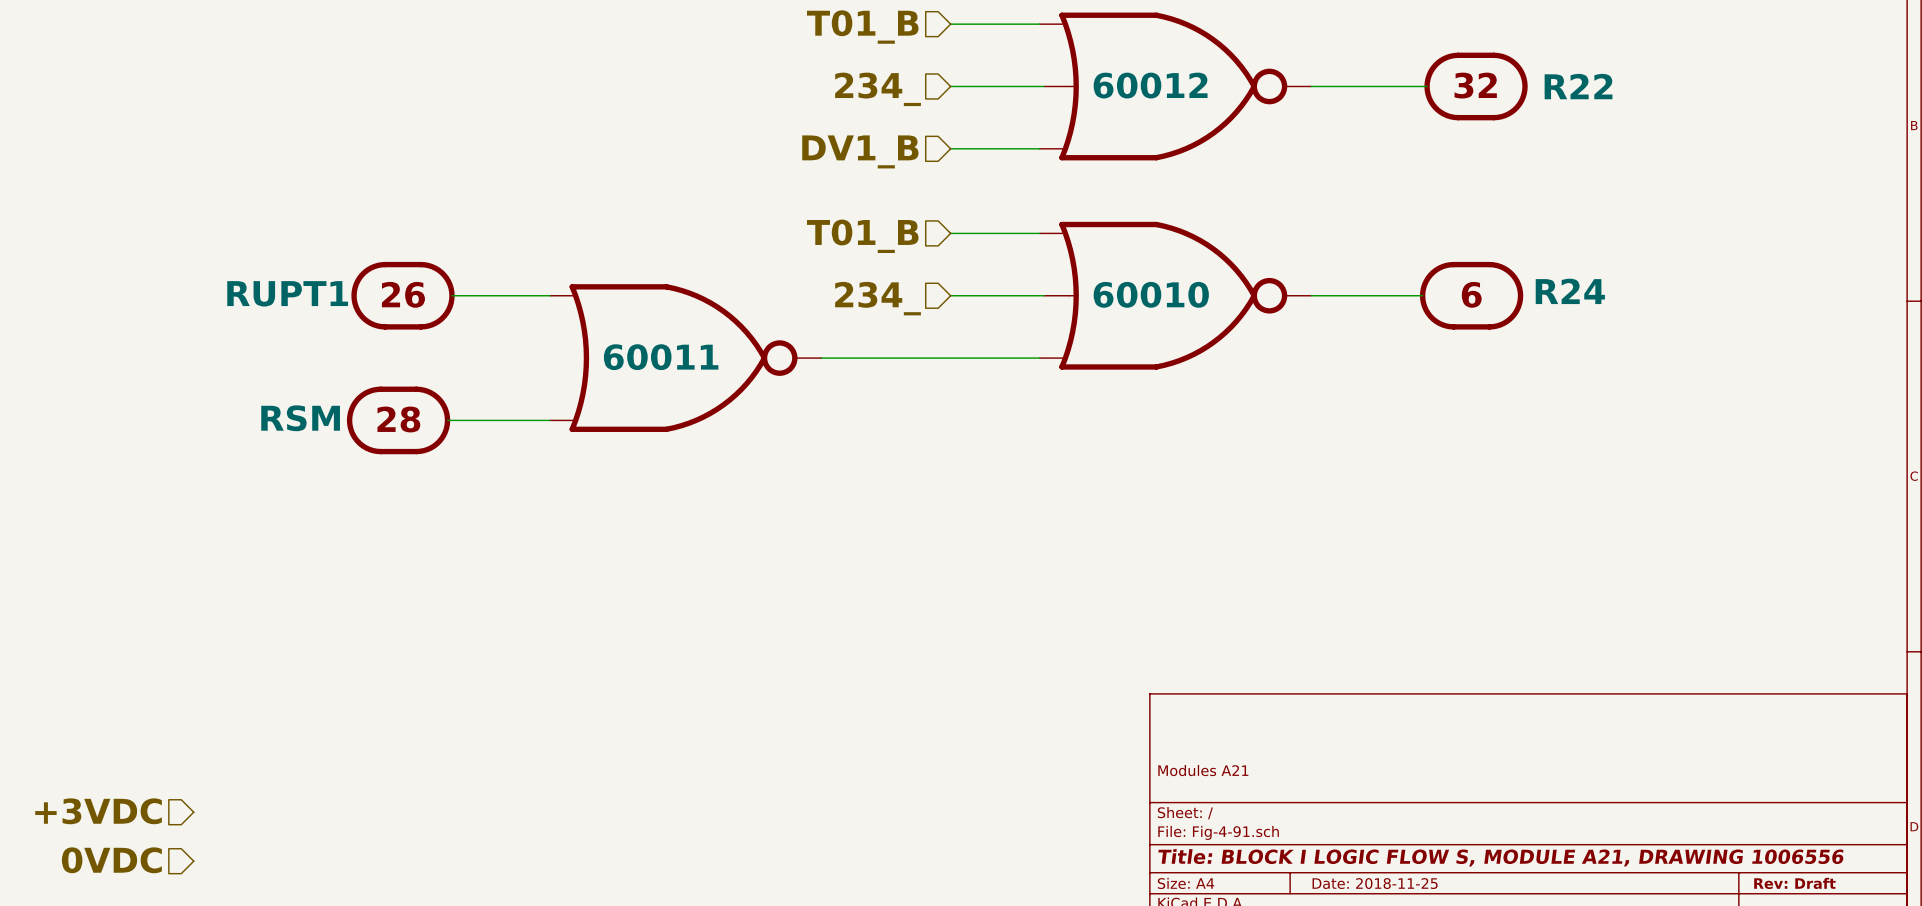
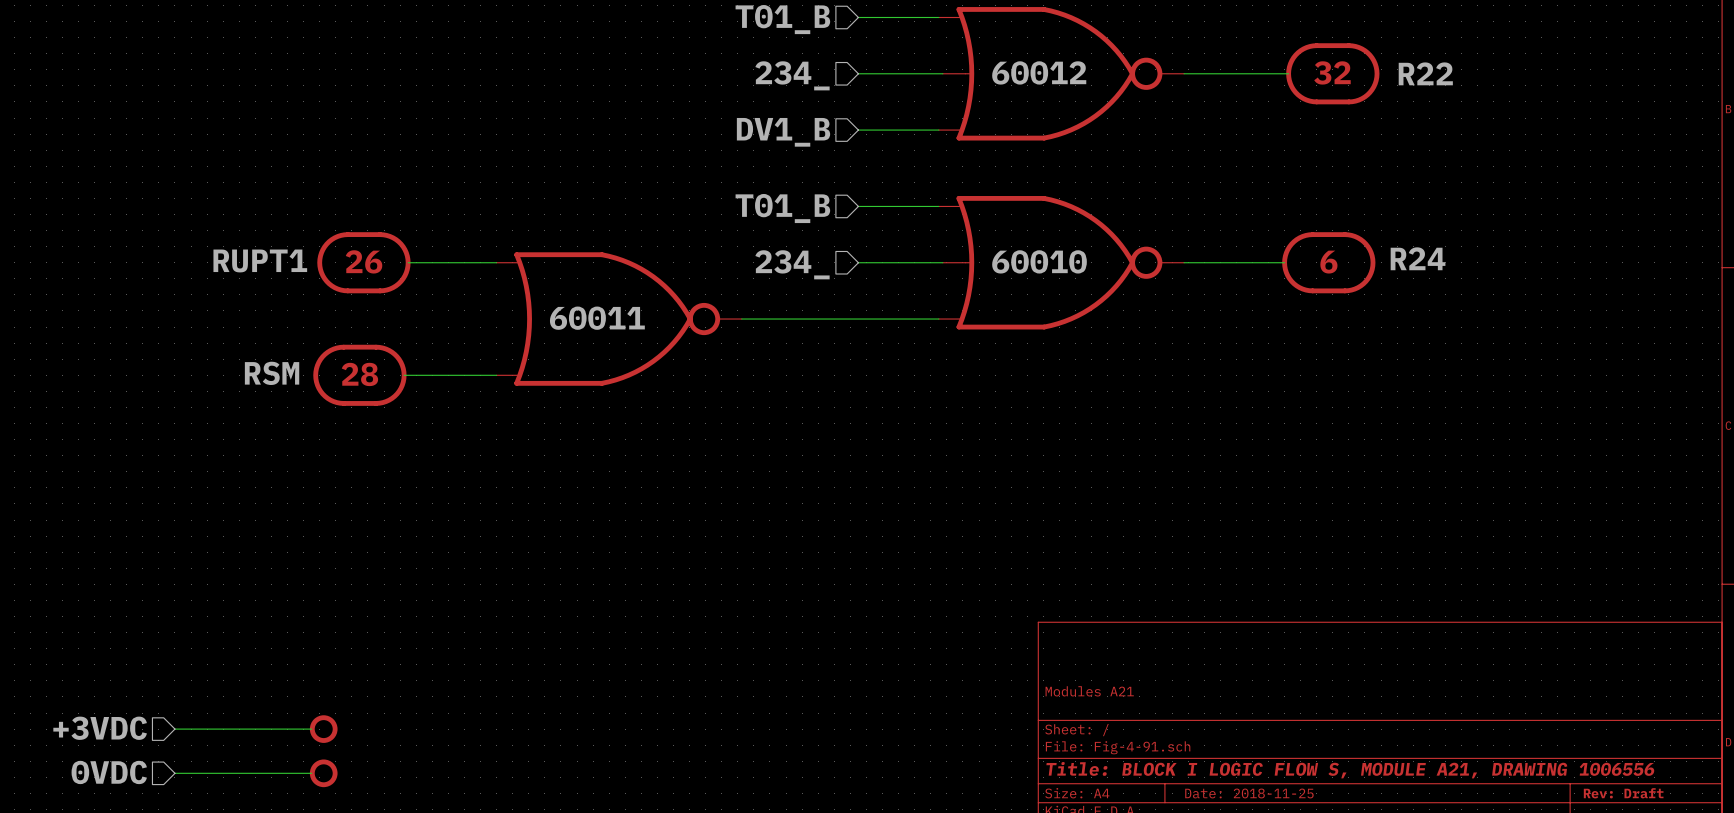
wire: none -> (174, 729) (311, 729)
part: none -> (323, 729)
wire: none -> (174, 773) (311, 773)
part: none -> (323, 773)

